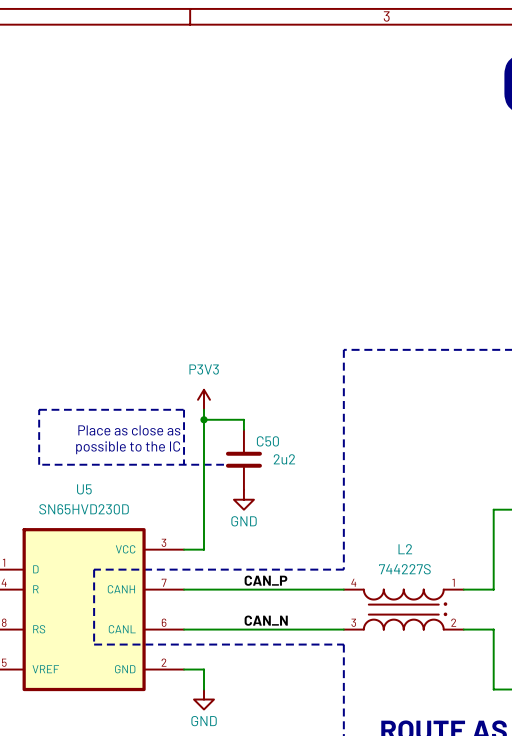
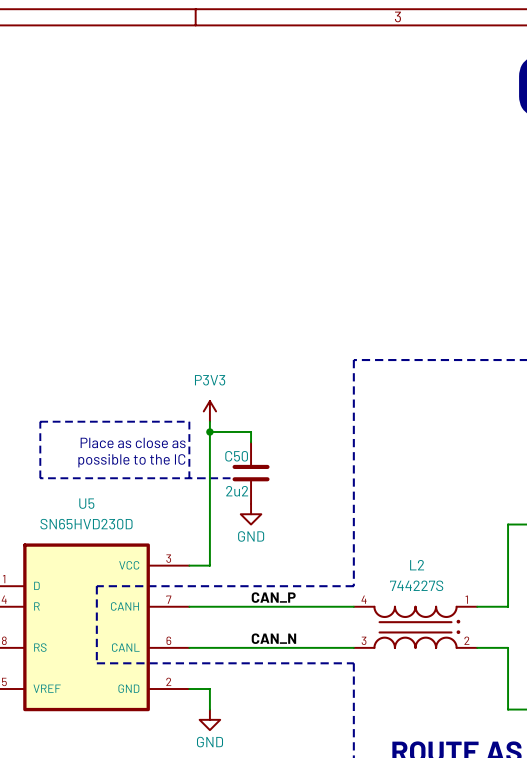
C50 name position: C50 (267, 441) -> C50 (236, 456)
C50 value position: 2u2 (284, 459) -> 2u2 (237, 491)

